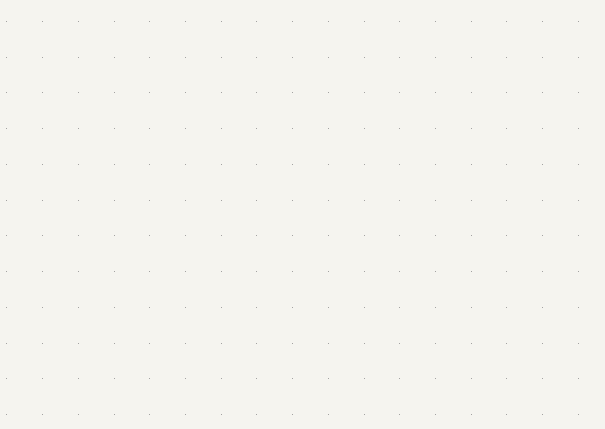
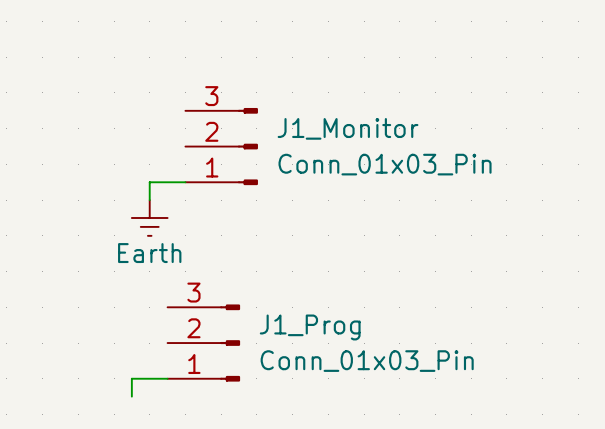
J1_Monitor: none -> Conn_01x03_Pin (221, 146)
wire: none -> (185, 182) (149, 182) (149, 200)
power symbol: none -> Earth (149, 218)
J1_Prog: none -> Conn_01x03_Pin (203, 343)
wire: none -> (167, 378) (131, 378) (131, 396)

